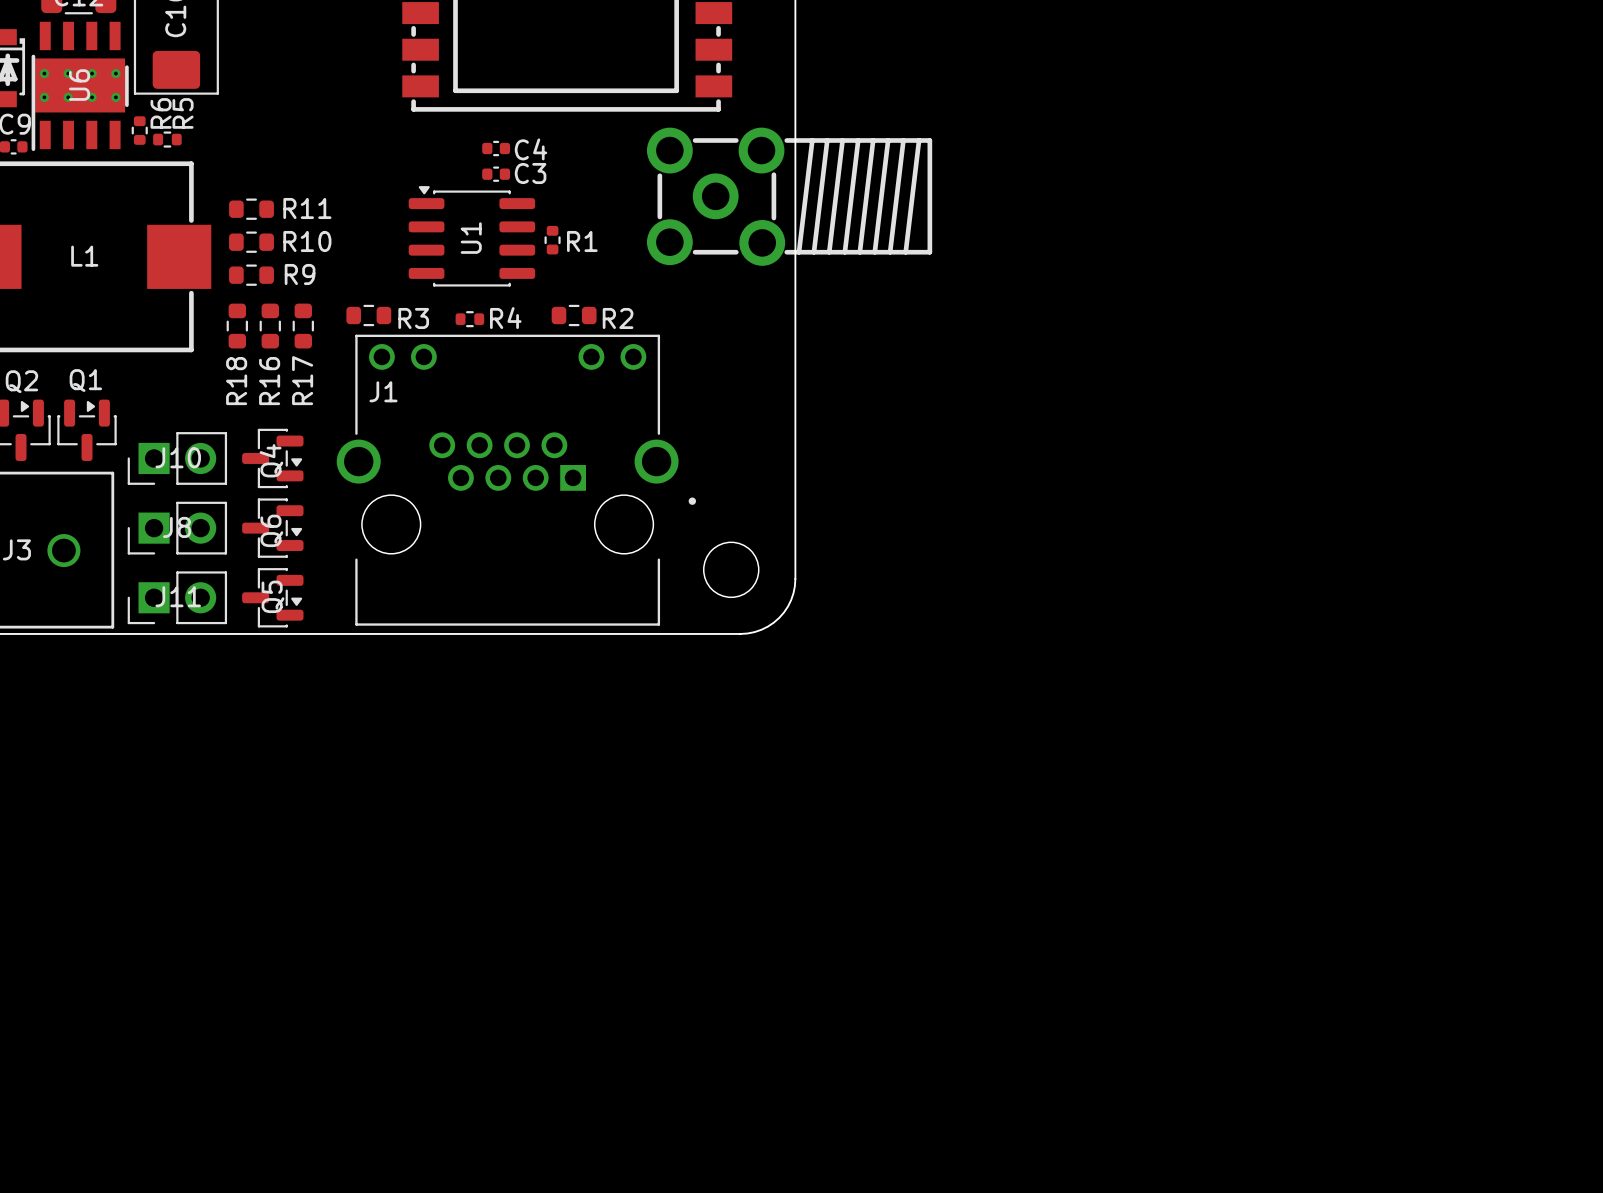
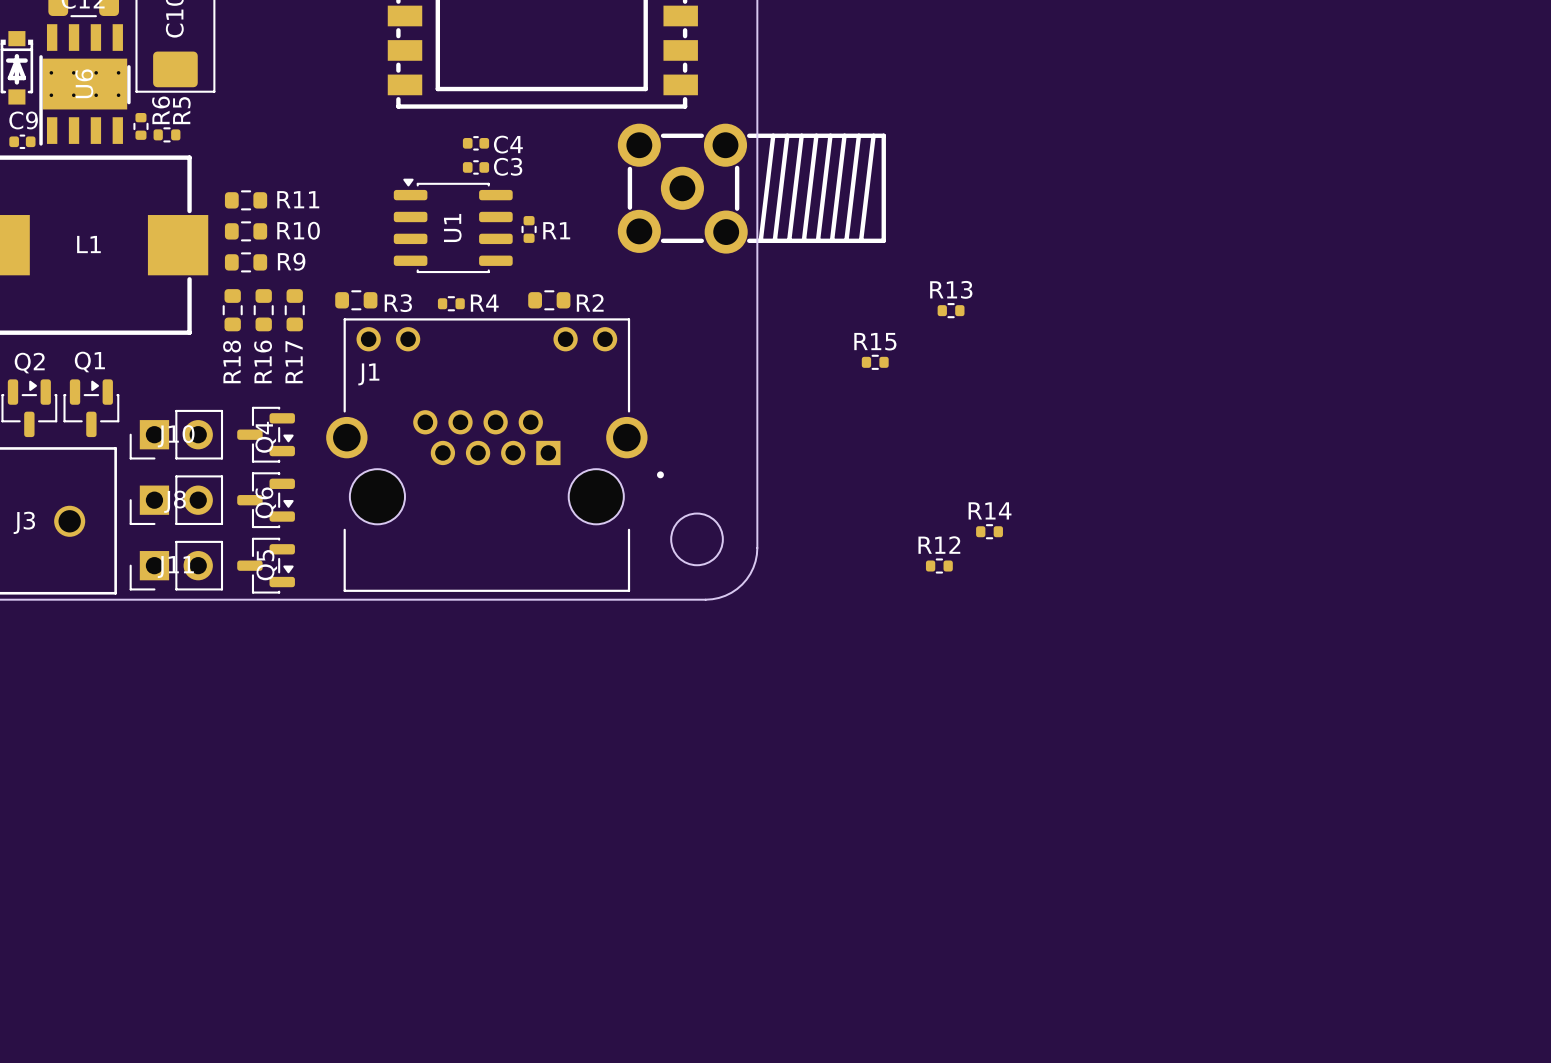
R13: none -> (951, 310)
R15: none -> (875, 362)
R14: none -> (989, 531)
R12: none -> (939, 566)

